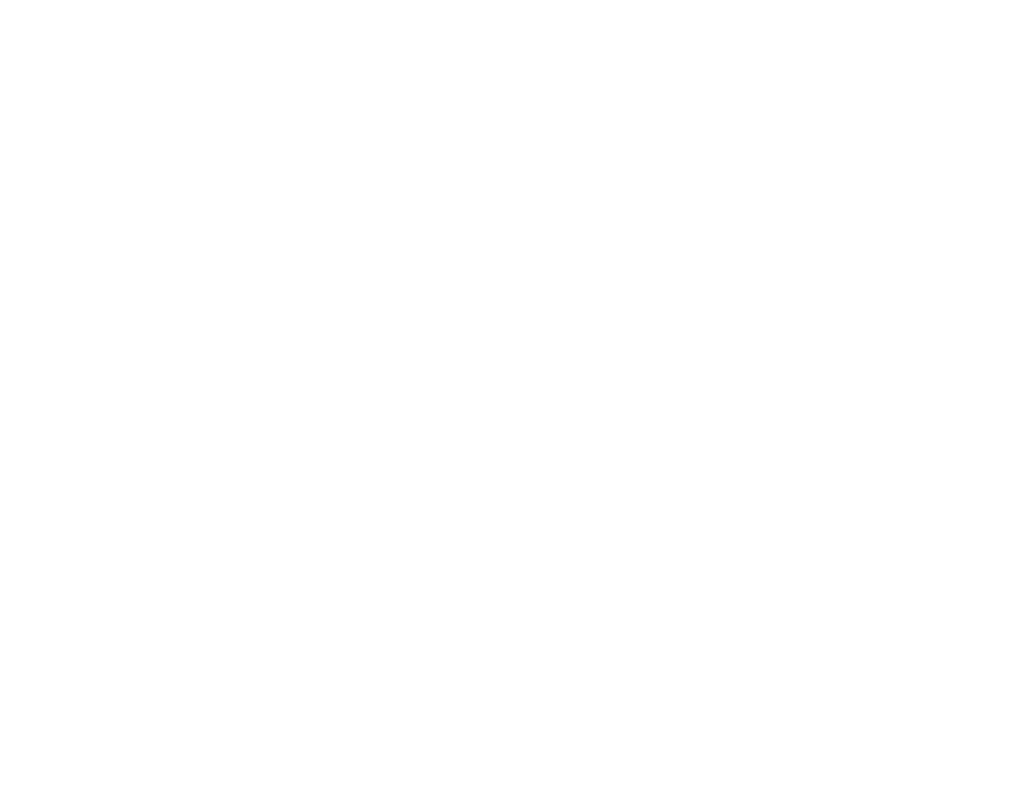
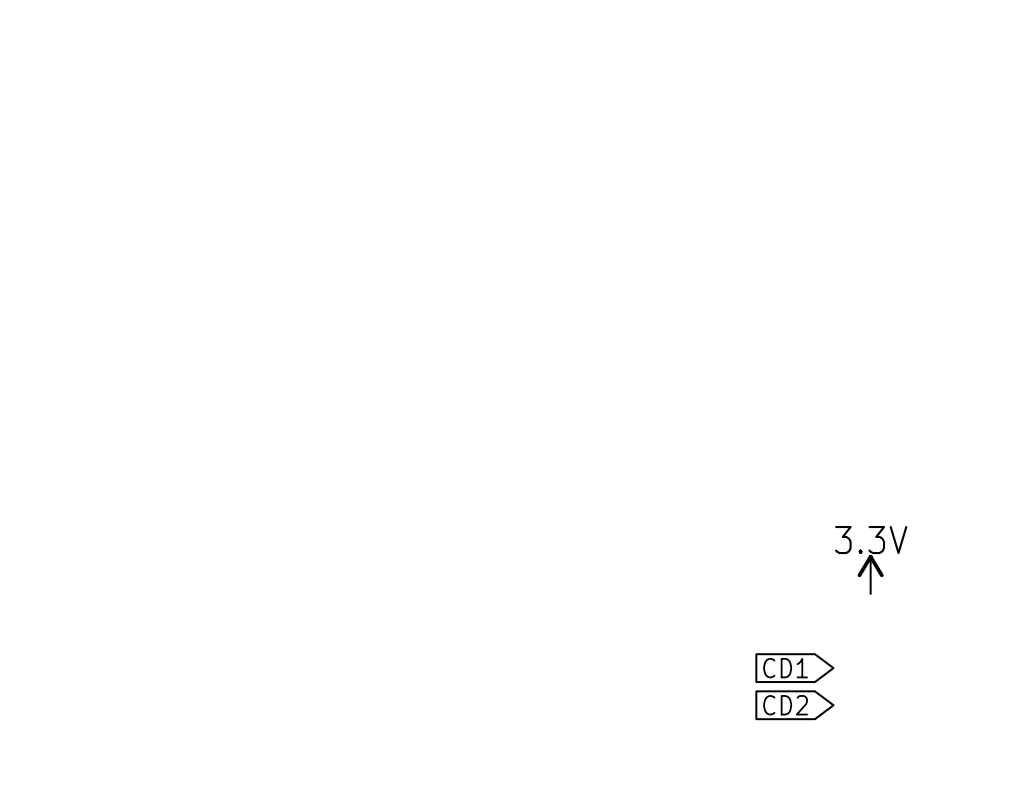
power symbol: none -> 3.3V (870, 574)
global label: none -> CD1 (785, 668)
global label: none -> CD2 (785, 705)

